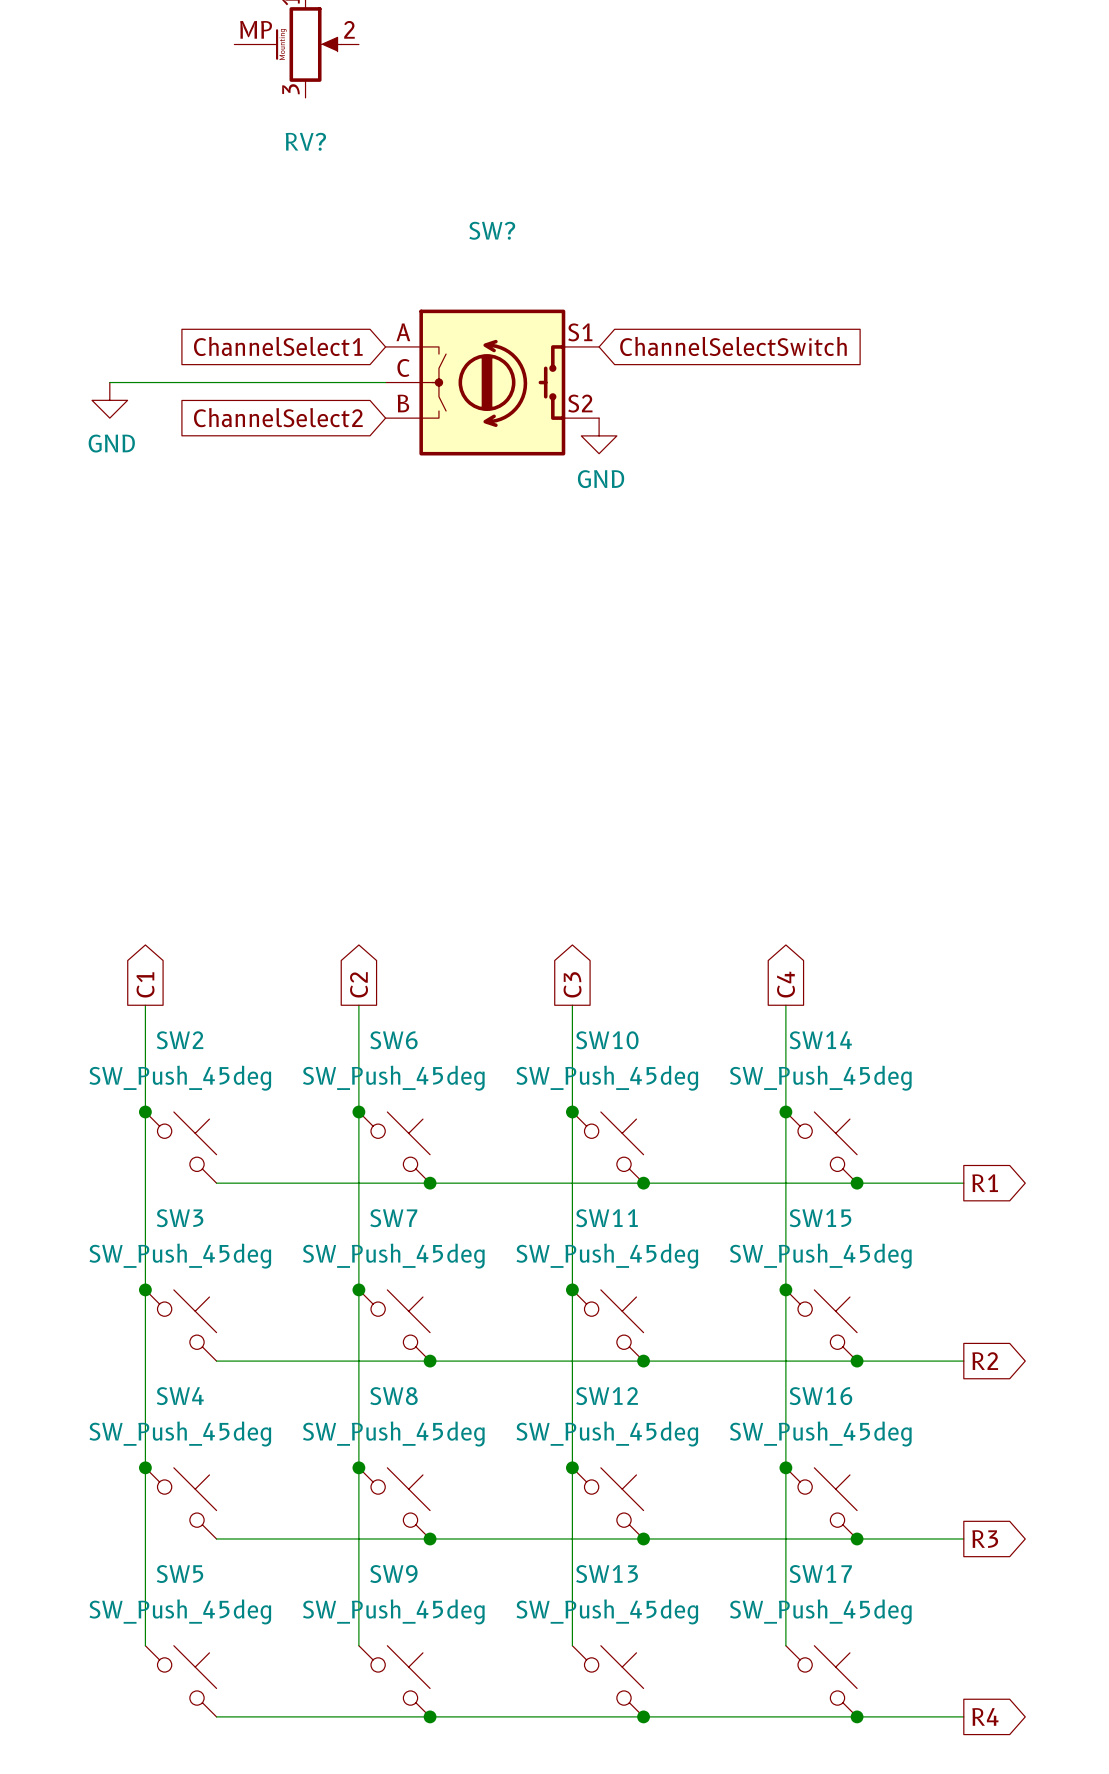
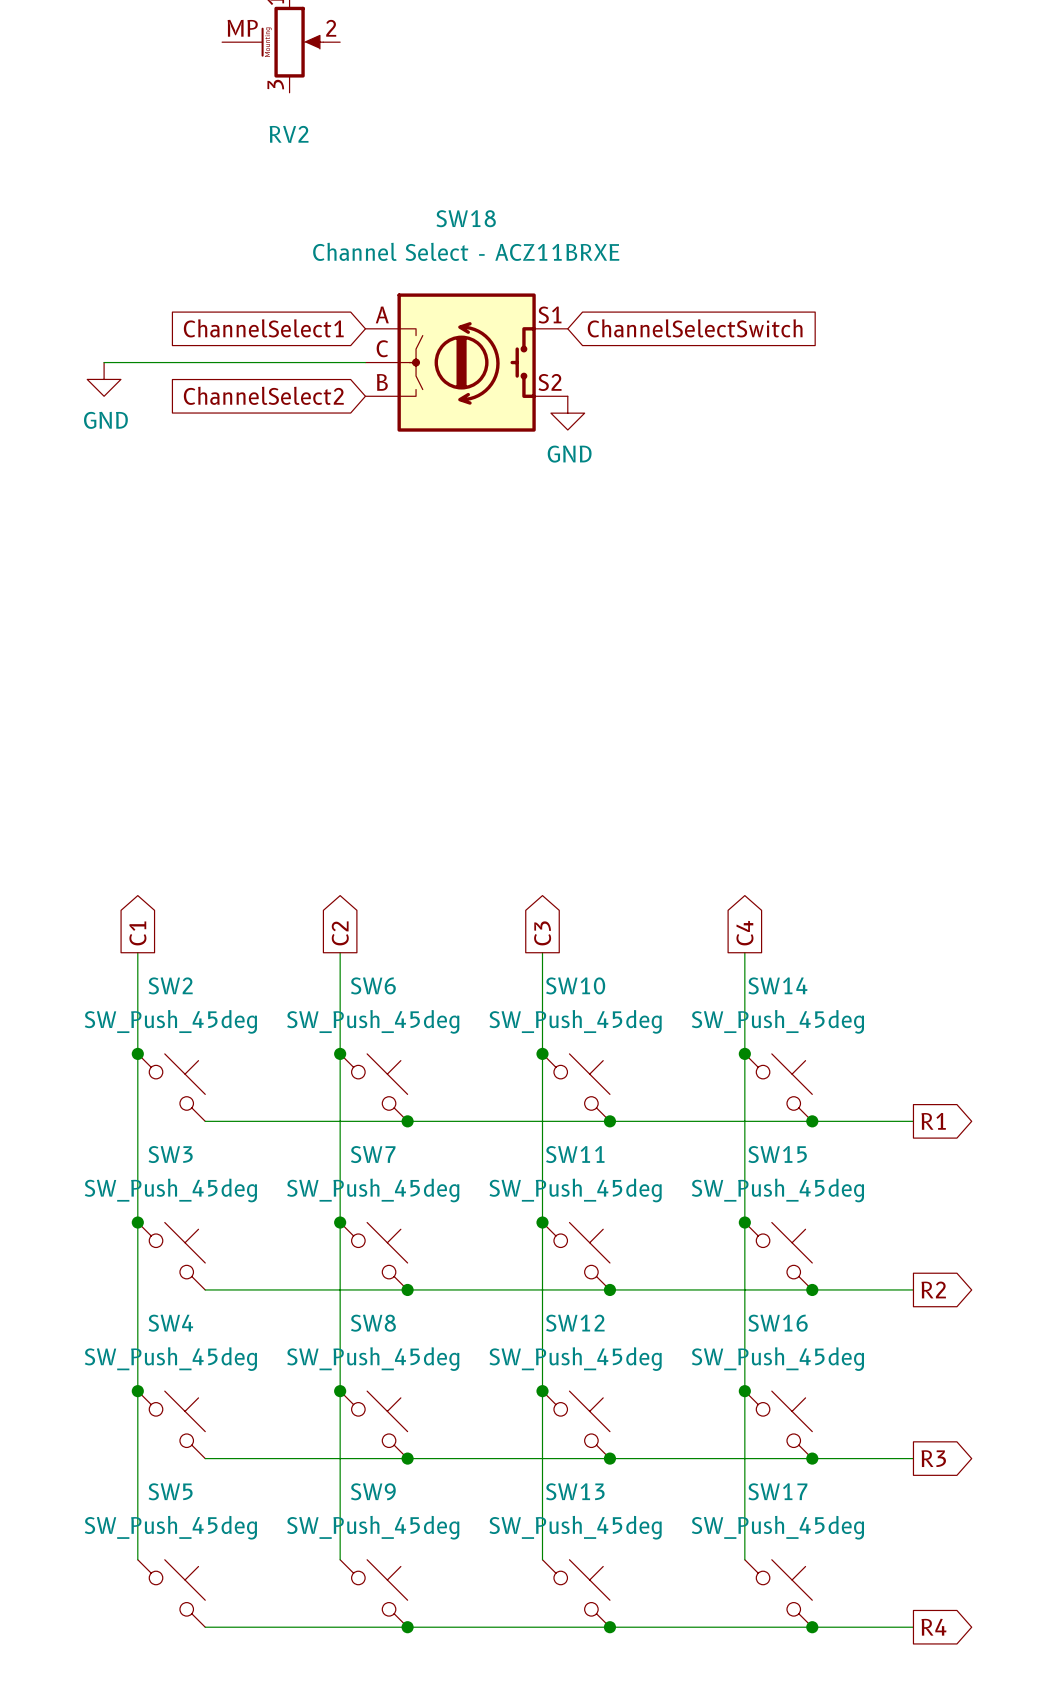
RV? name: RV? (305, 141) -> RV2 (289, 134)
SW? name: SW? (492, 230) -> SW18 (466, 218)
SW? value: none -> Channel Select - ACZ11BRXE (466, 251)

